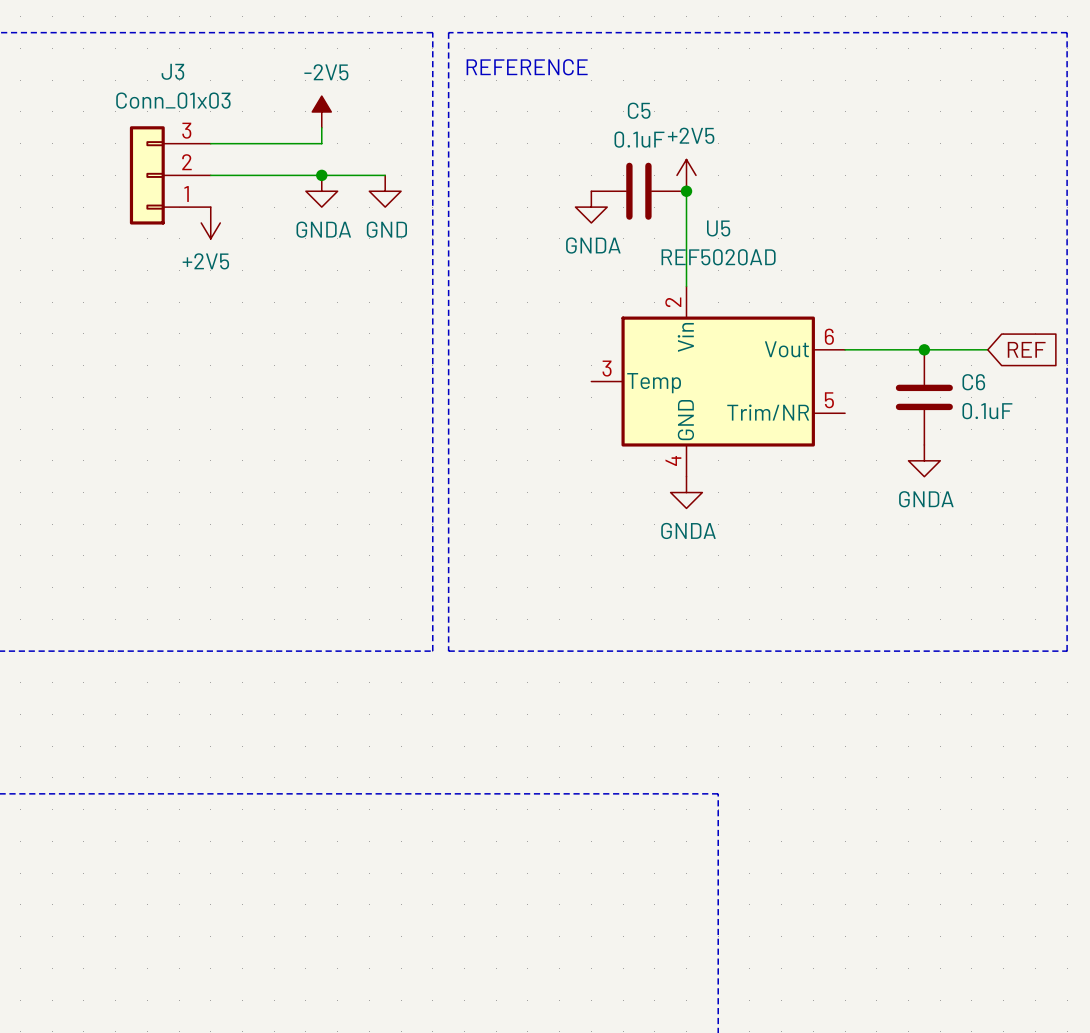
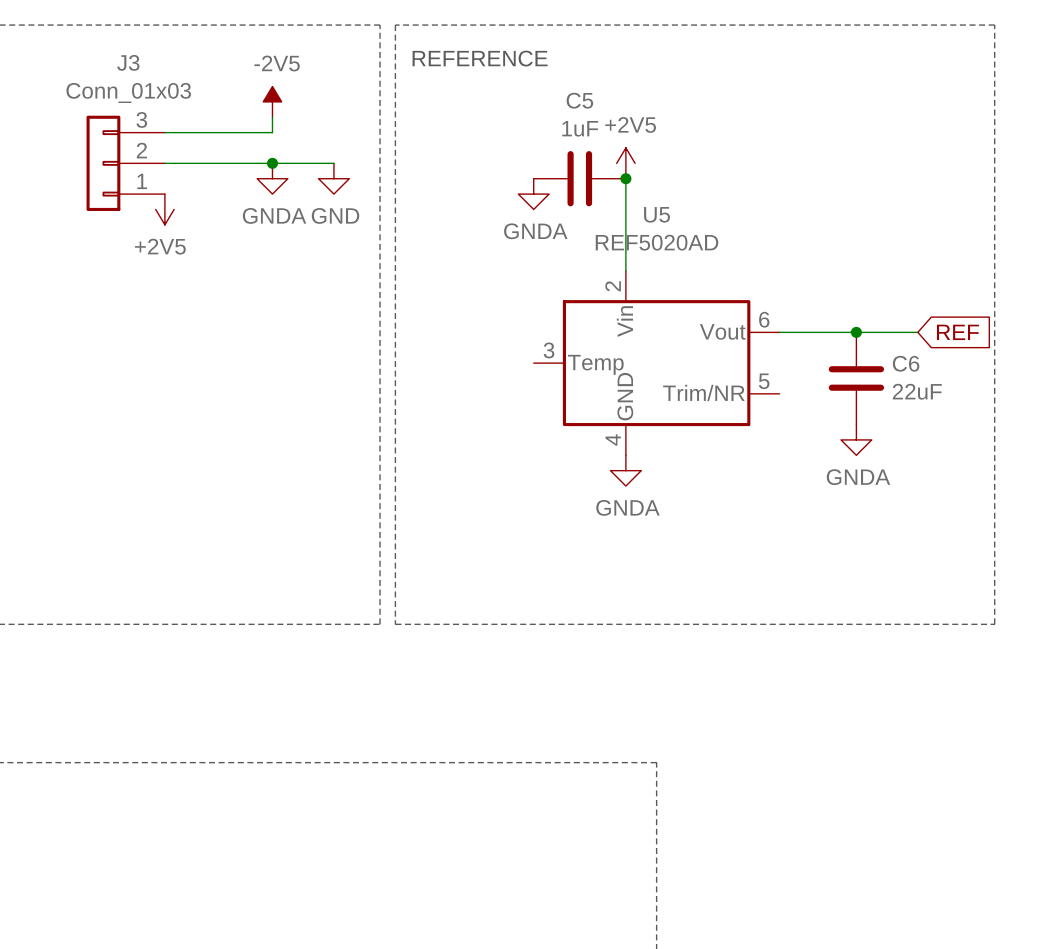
C5 value: 0.1uF (639, 139) -> 1uF (580, 128)
C6 value: 0.1uF (987, 411) -> 22uF (917, 391)

